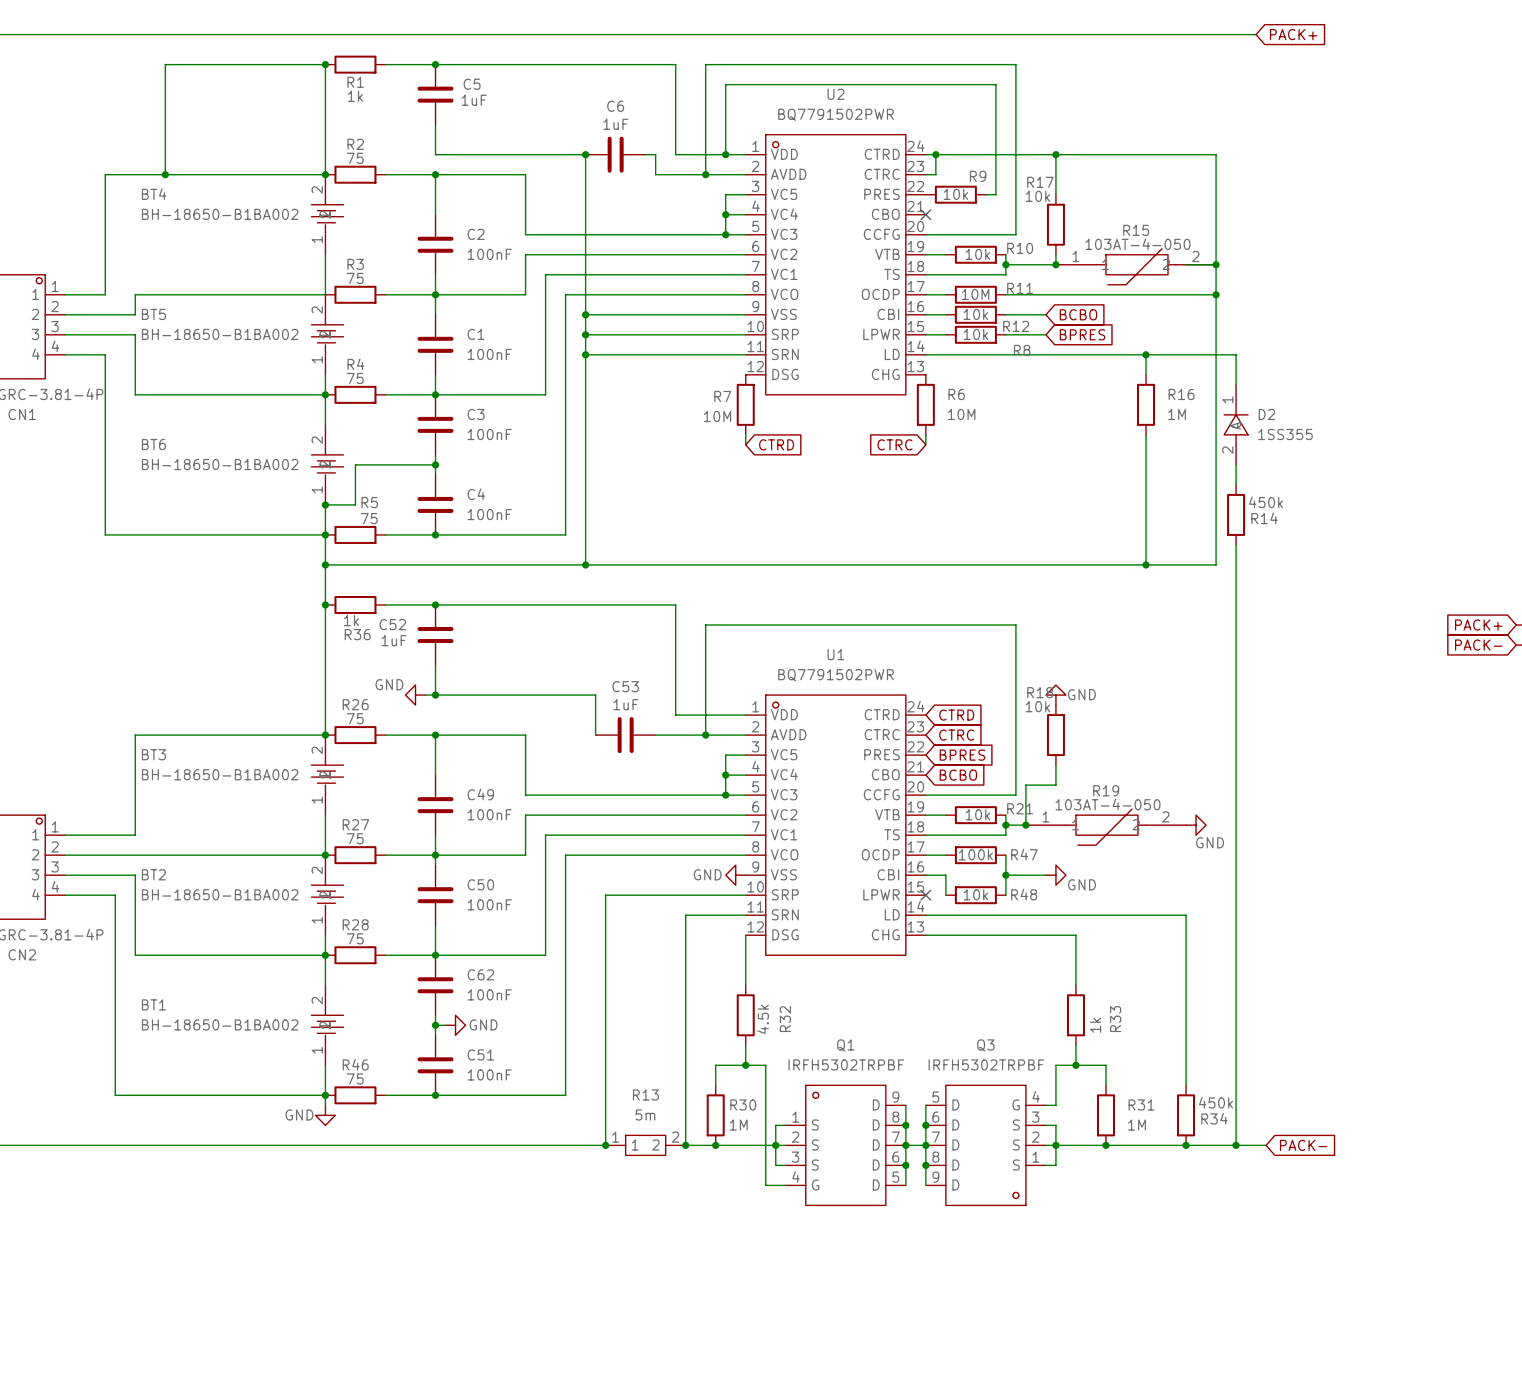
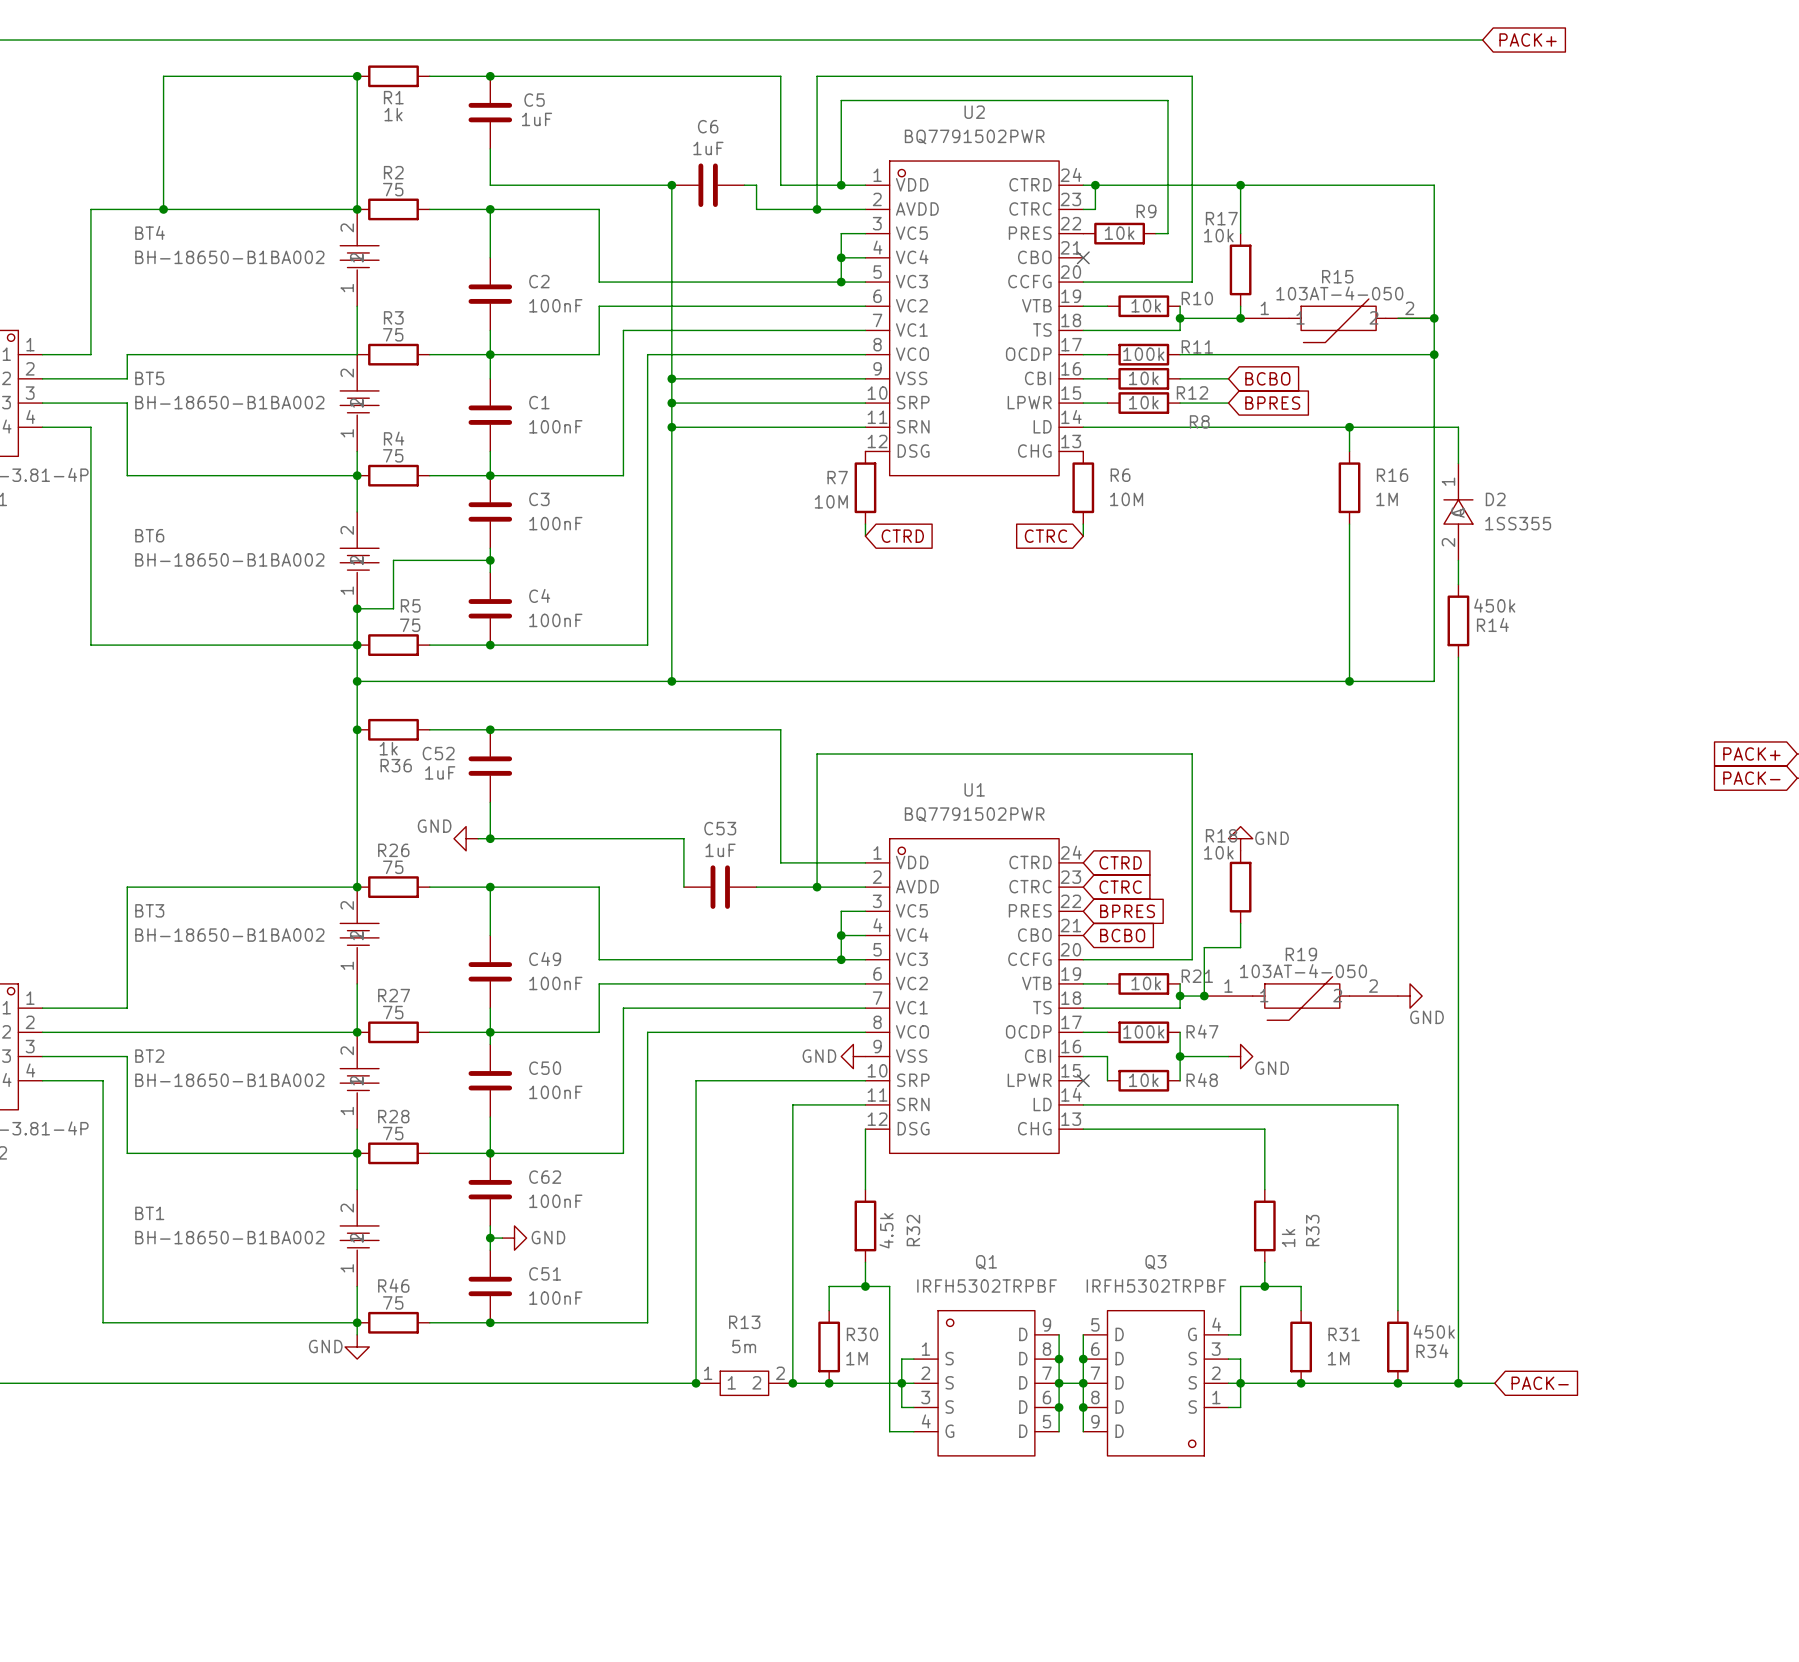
R11 value: 10M (975, 294) -> 100k (1143, 354)

